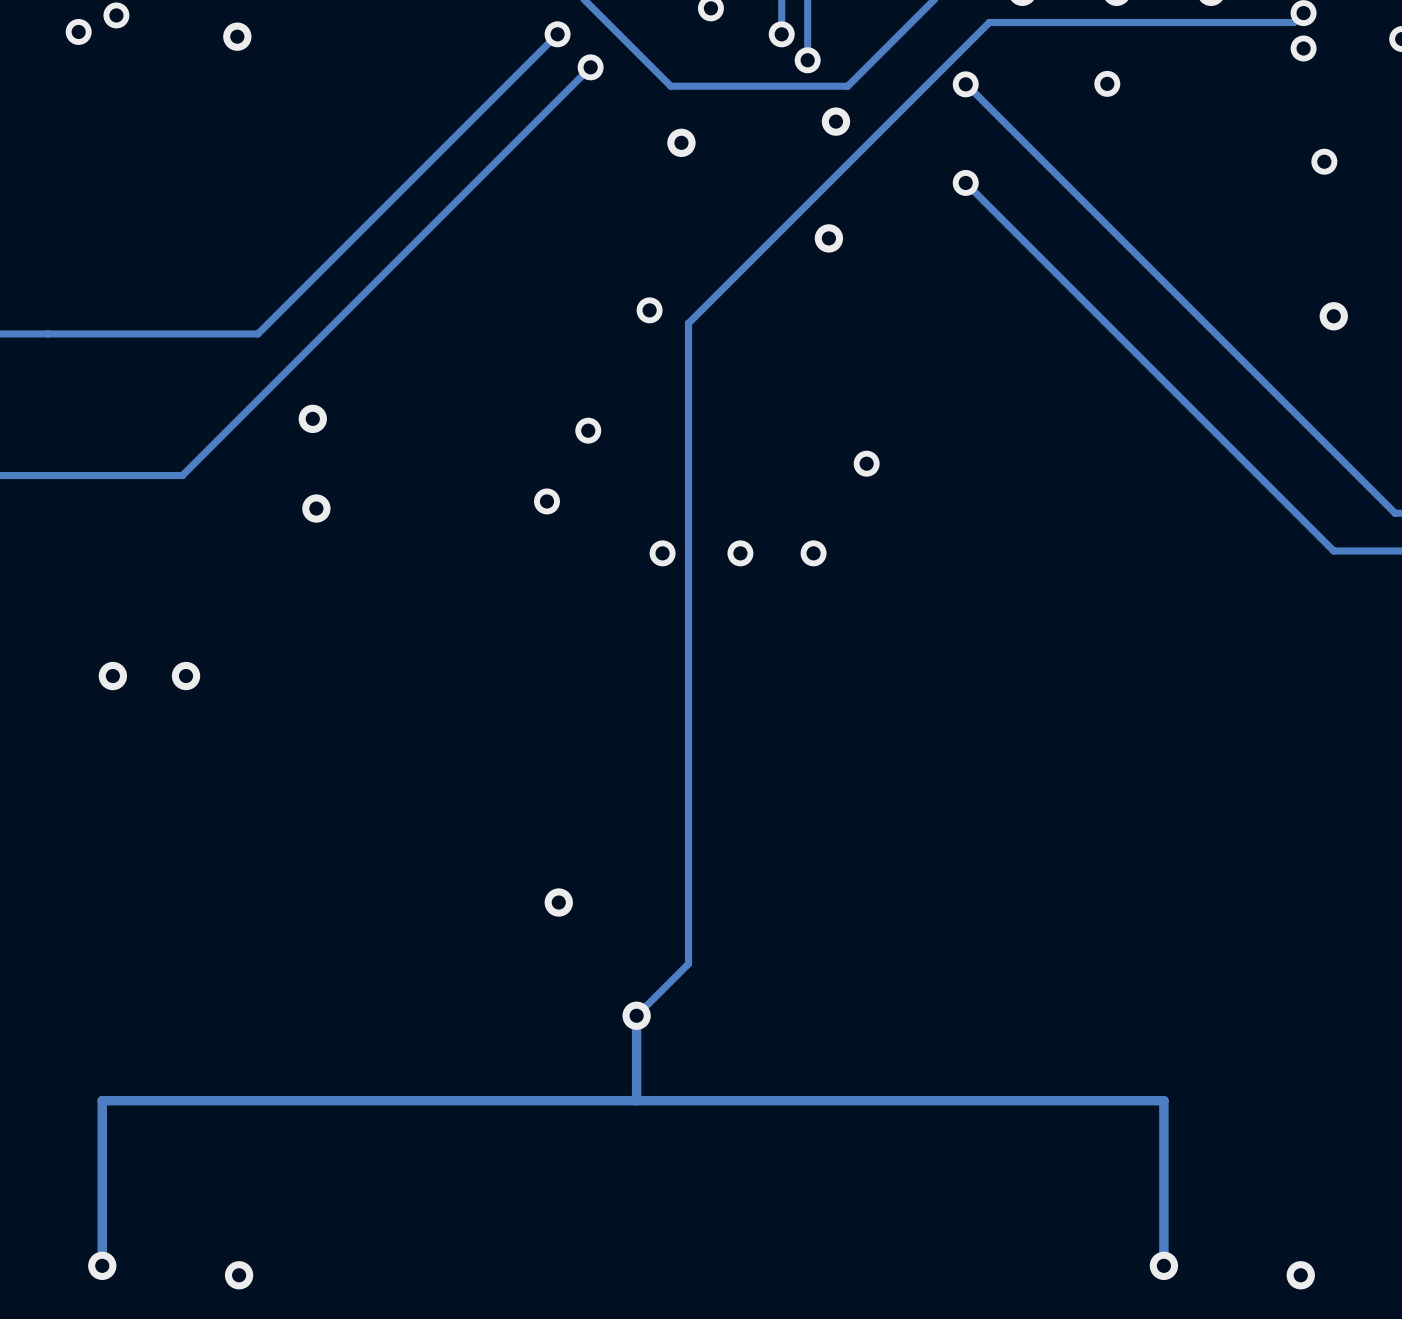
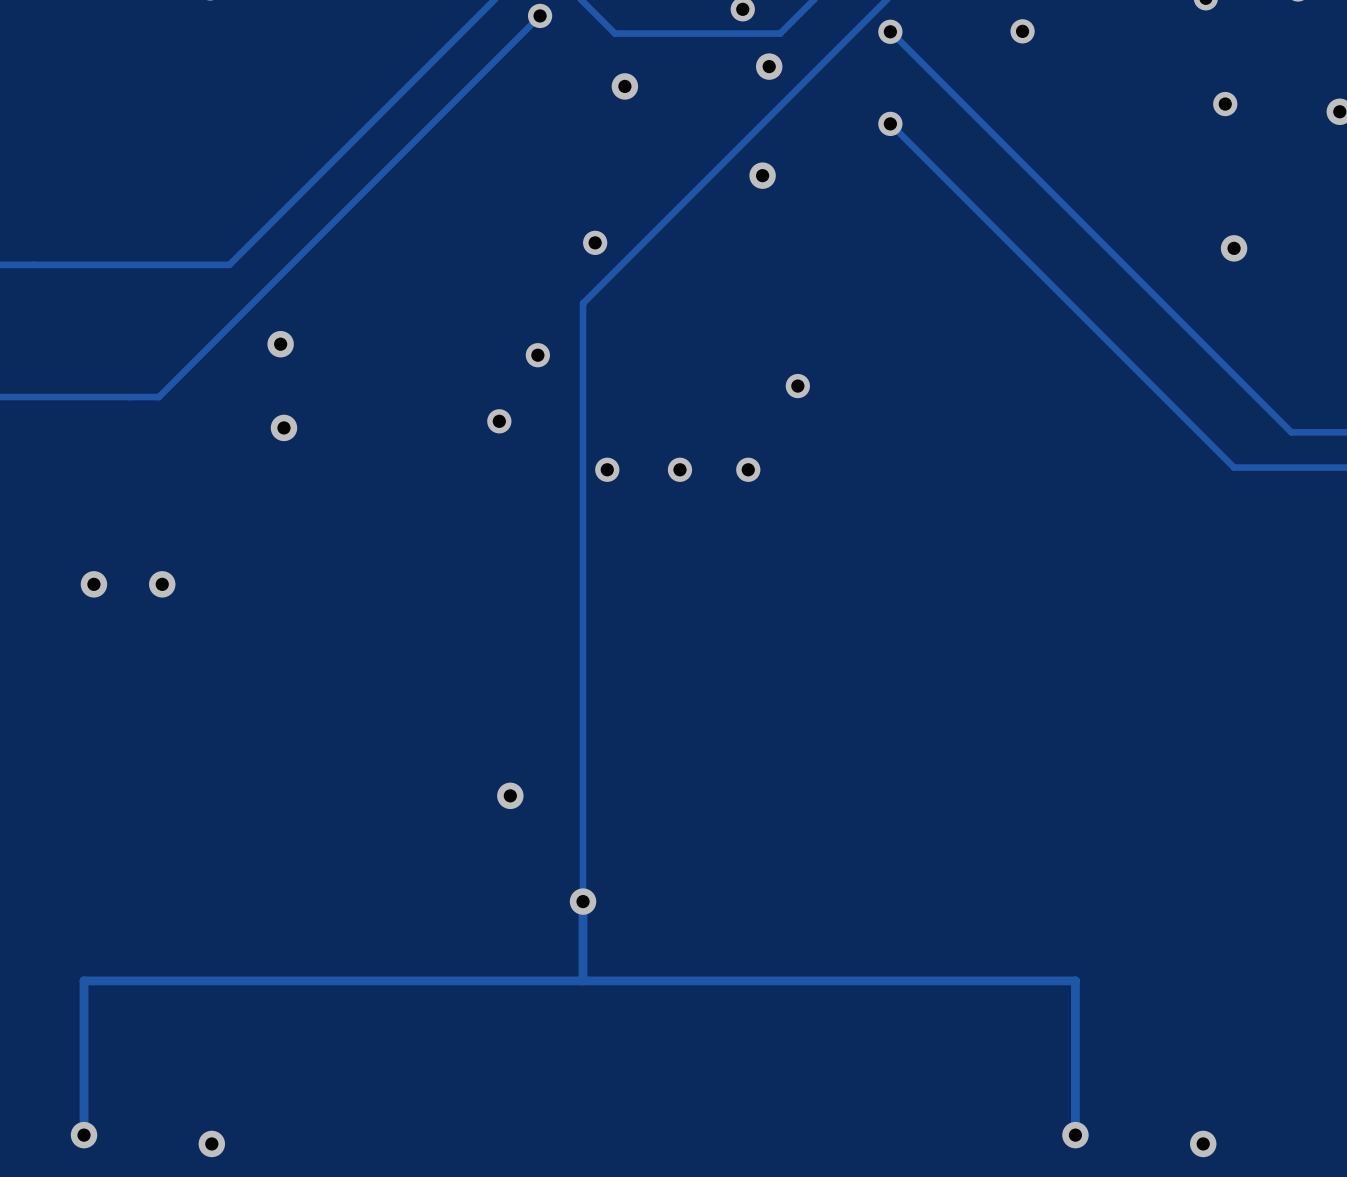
track: (688, 323) (688, 963) (636, 1015) -> (631, 254) (583, 303) (583, 901)

